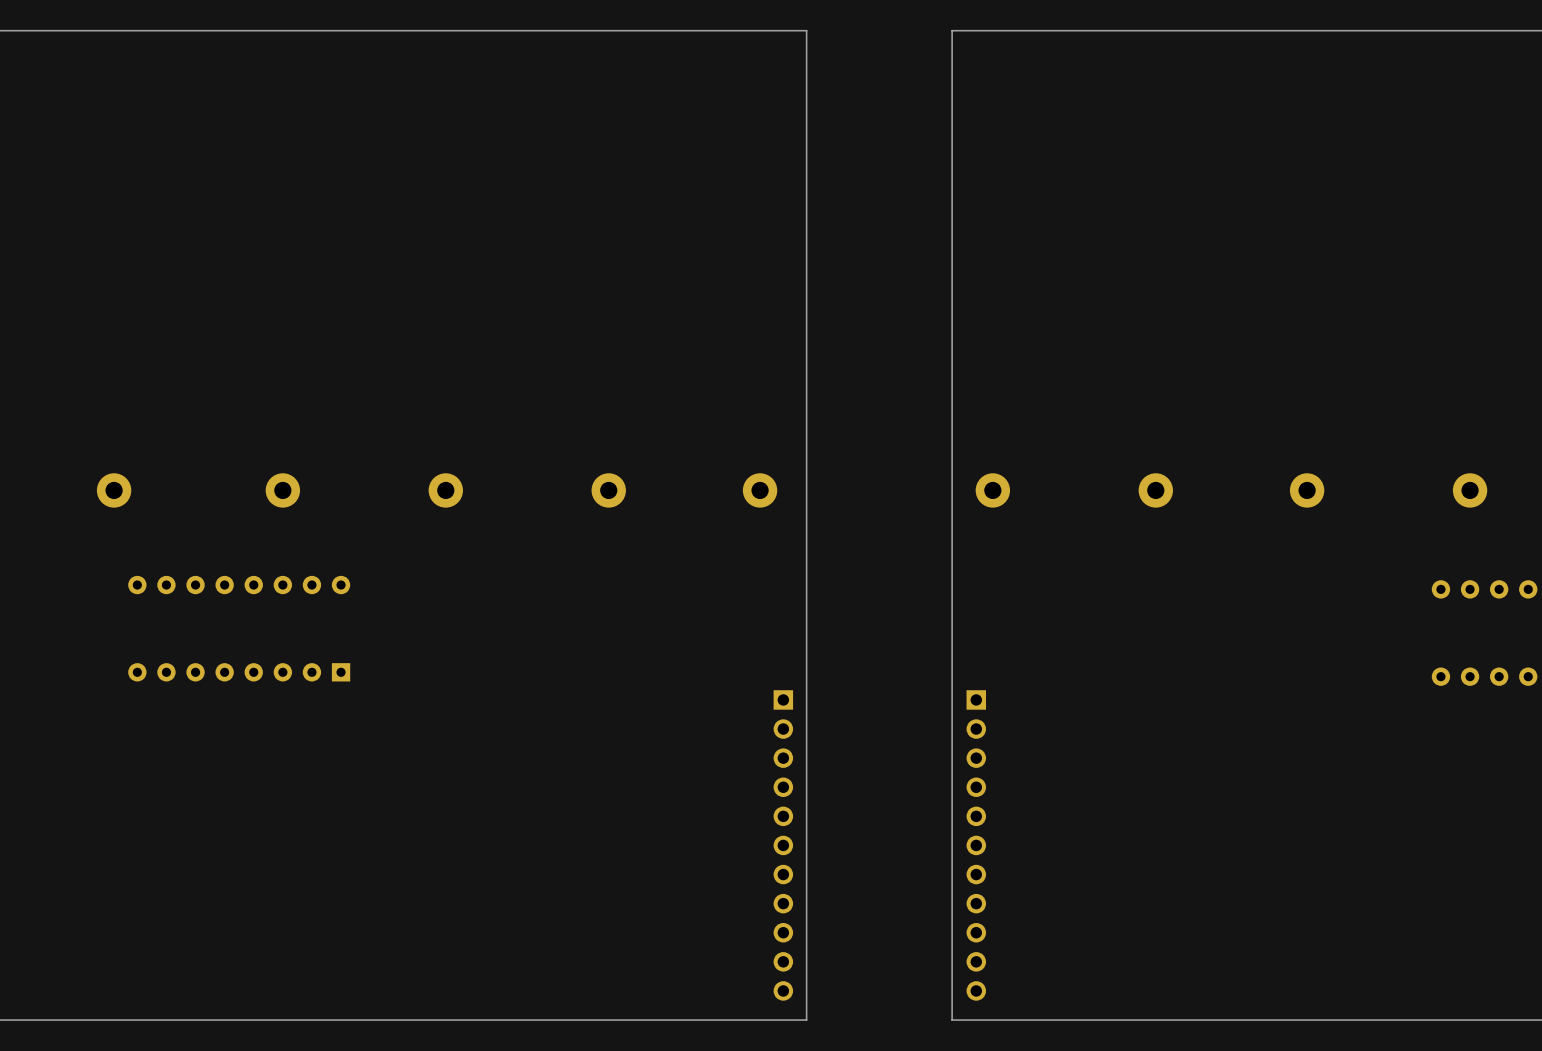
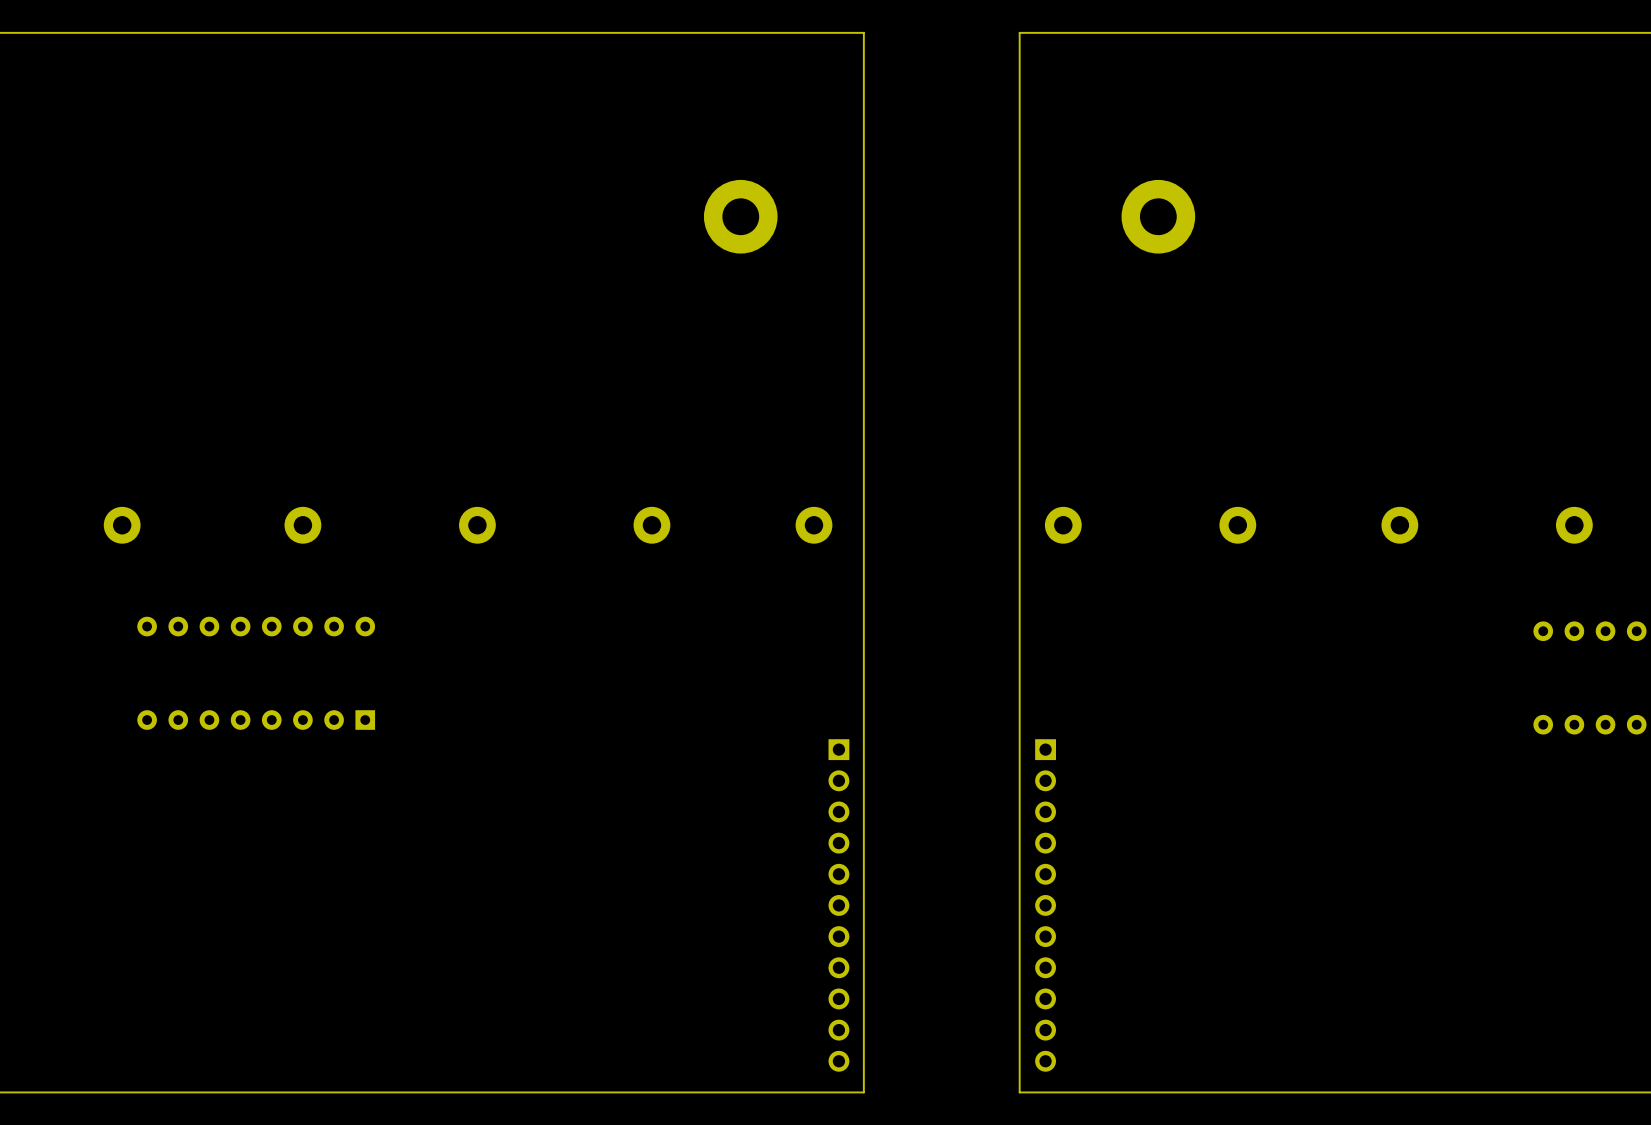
part: none -> (740, 216)
part: none -> (1158, 216)

